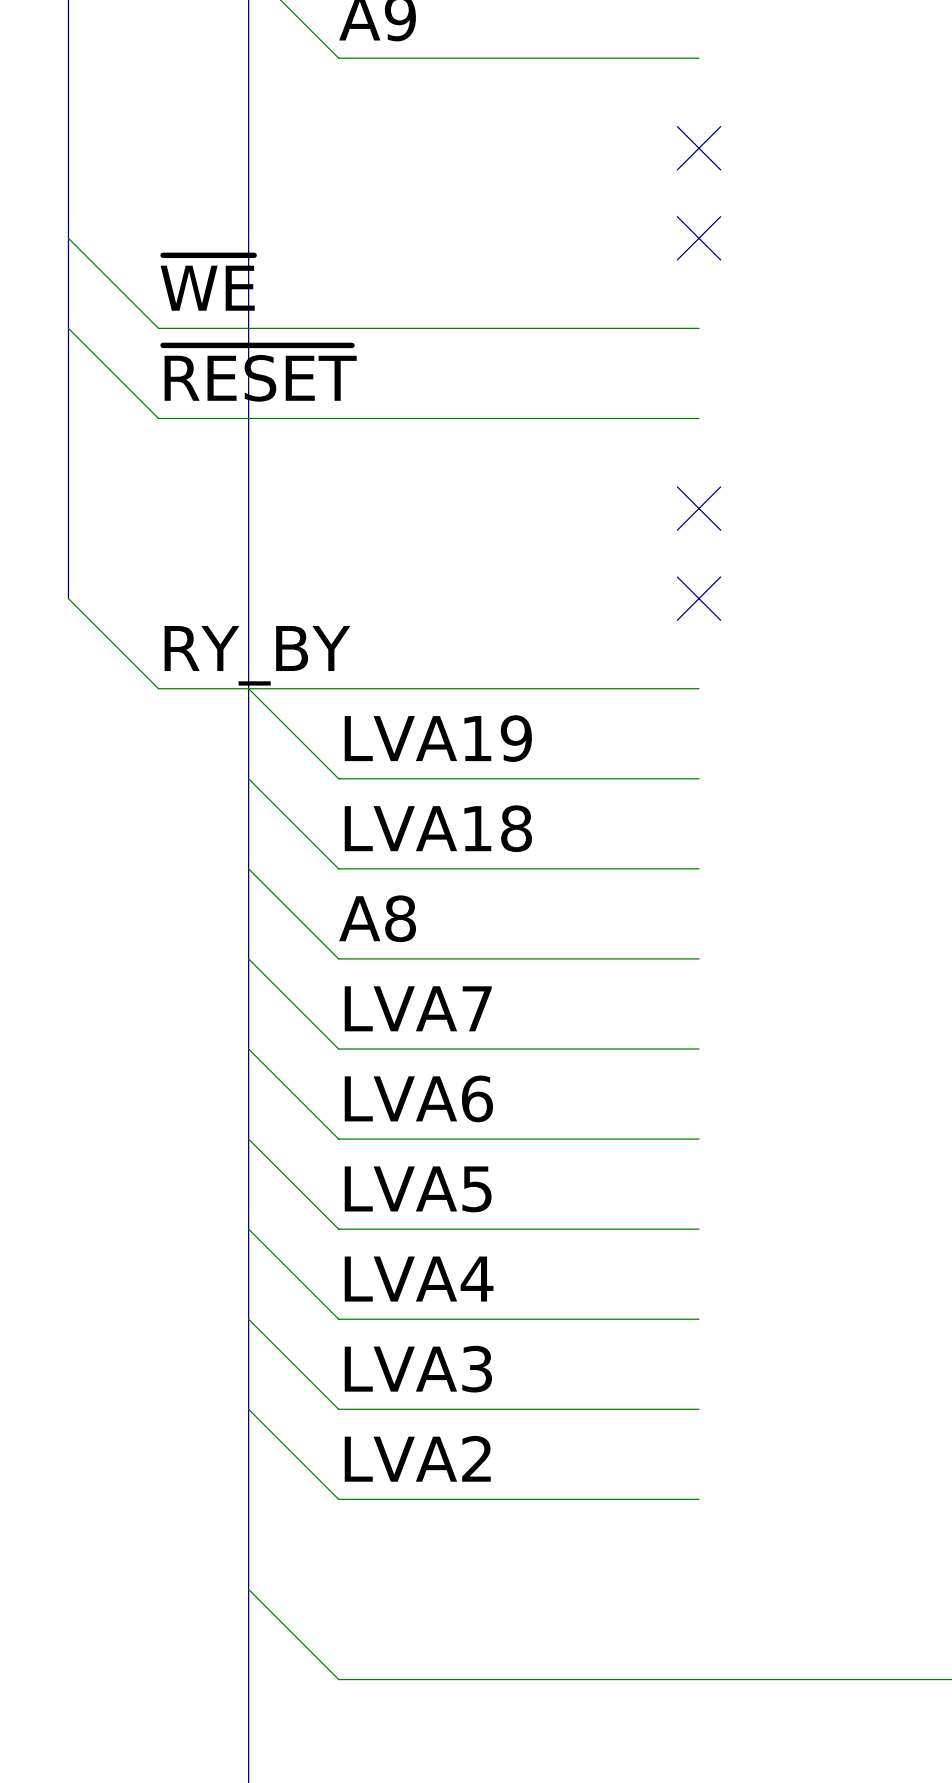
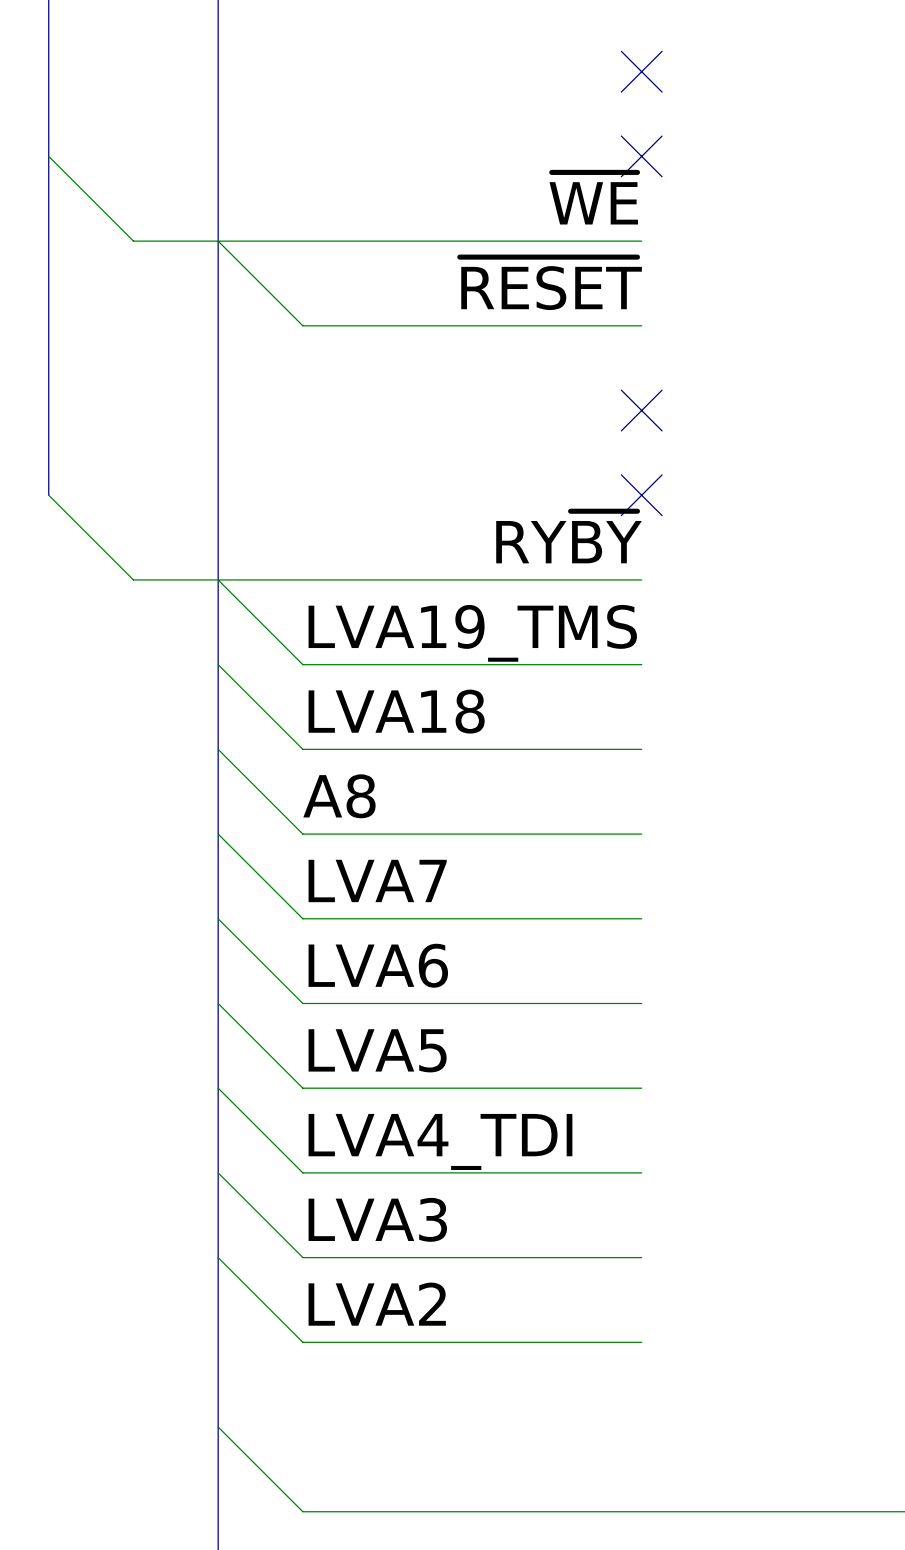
label position: ~{WE} (207, 283) -> ~{WE} (593, 198)
wire: (68, 328) (158, 418) (338, 418) -> (218, 241) (302, 325)
label position: ~{RESET} (259, 373) -> ~{RESET} (550, 283)
label: RY_BY (257, 655) -> RY~{BY} (569, 537)
label: LVA19 (438, 738) -> LVA19_TMS (472, 633)
label: LVA4 (419, 1279) -> LVA4_TDI (440, 1141)

